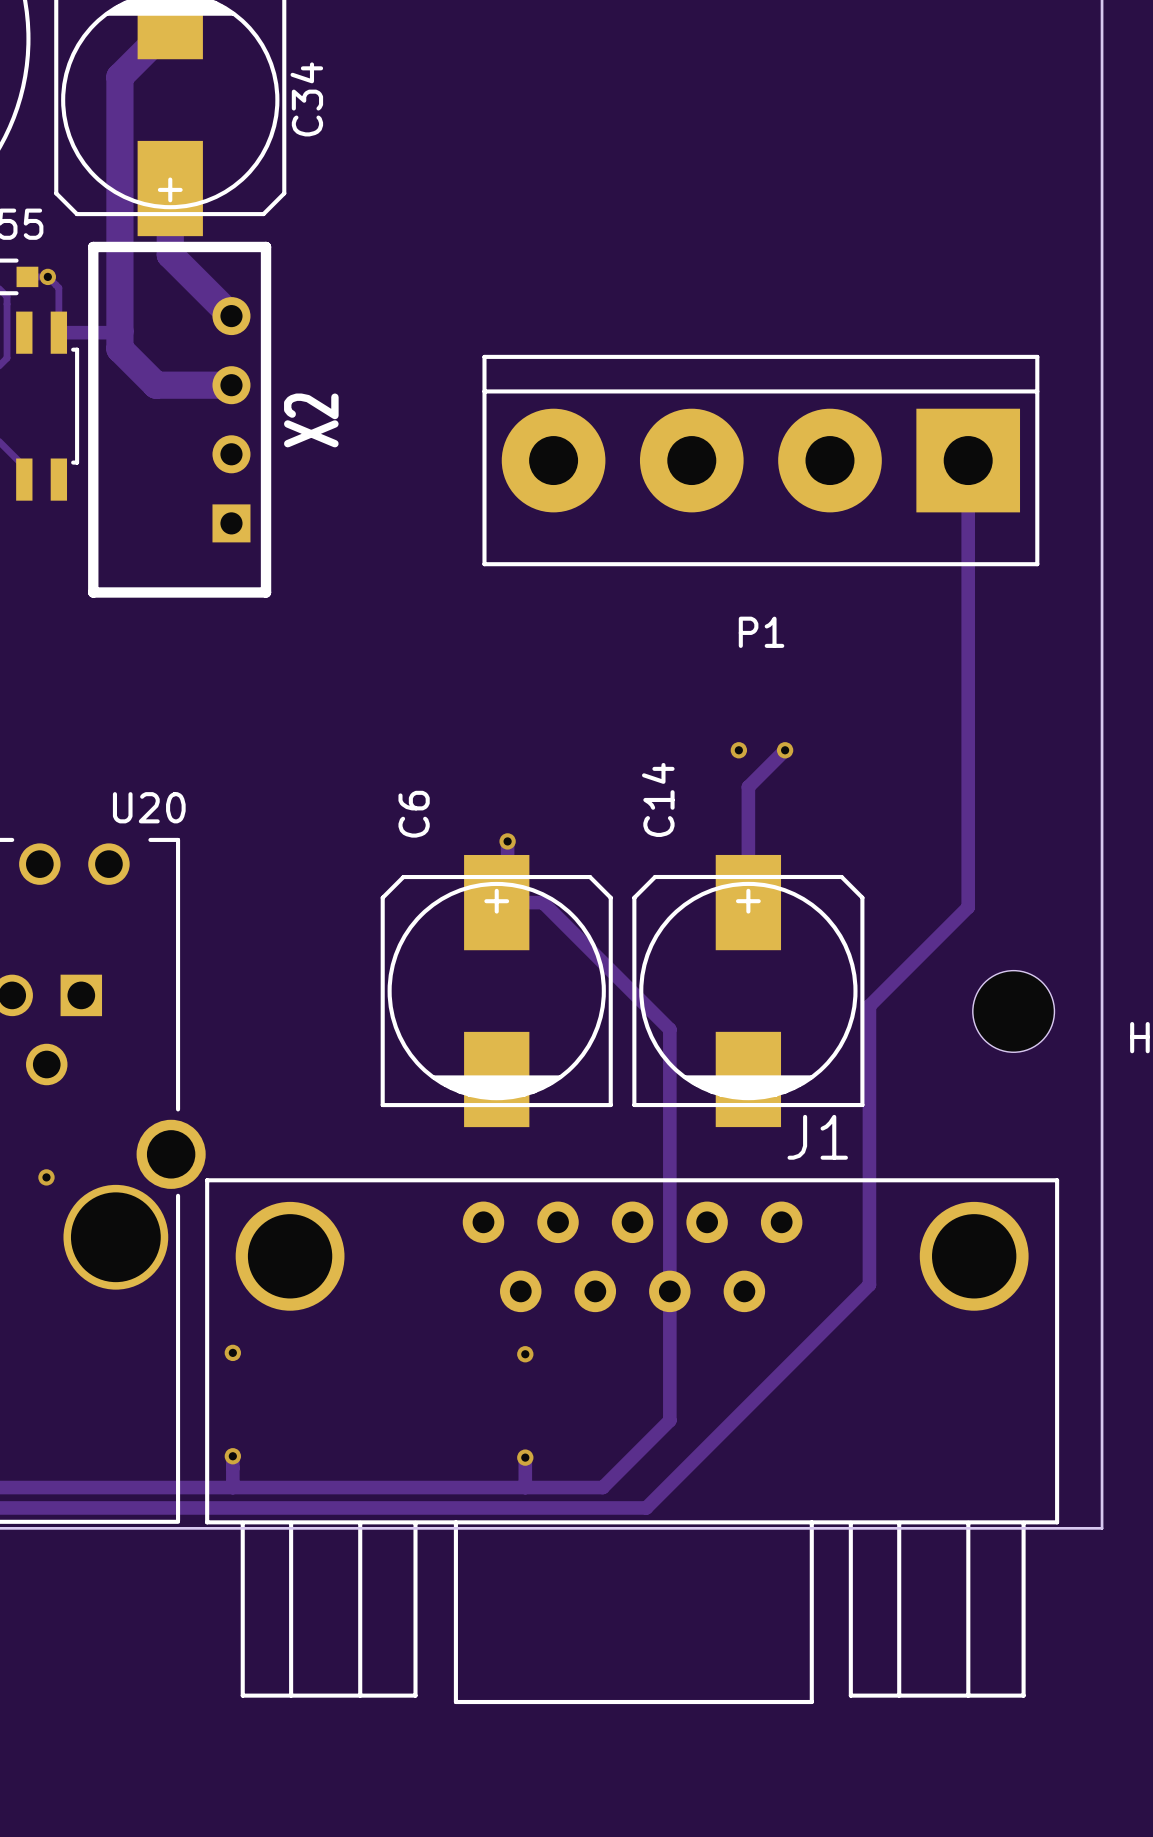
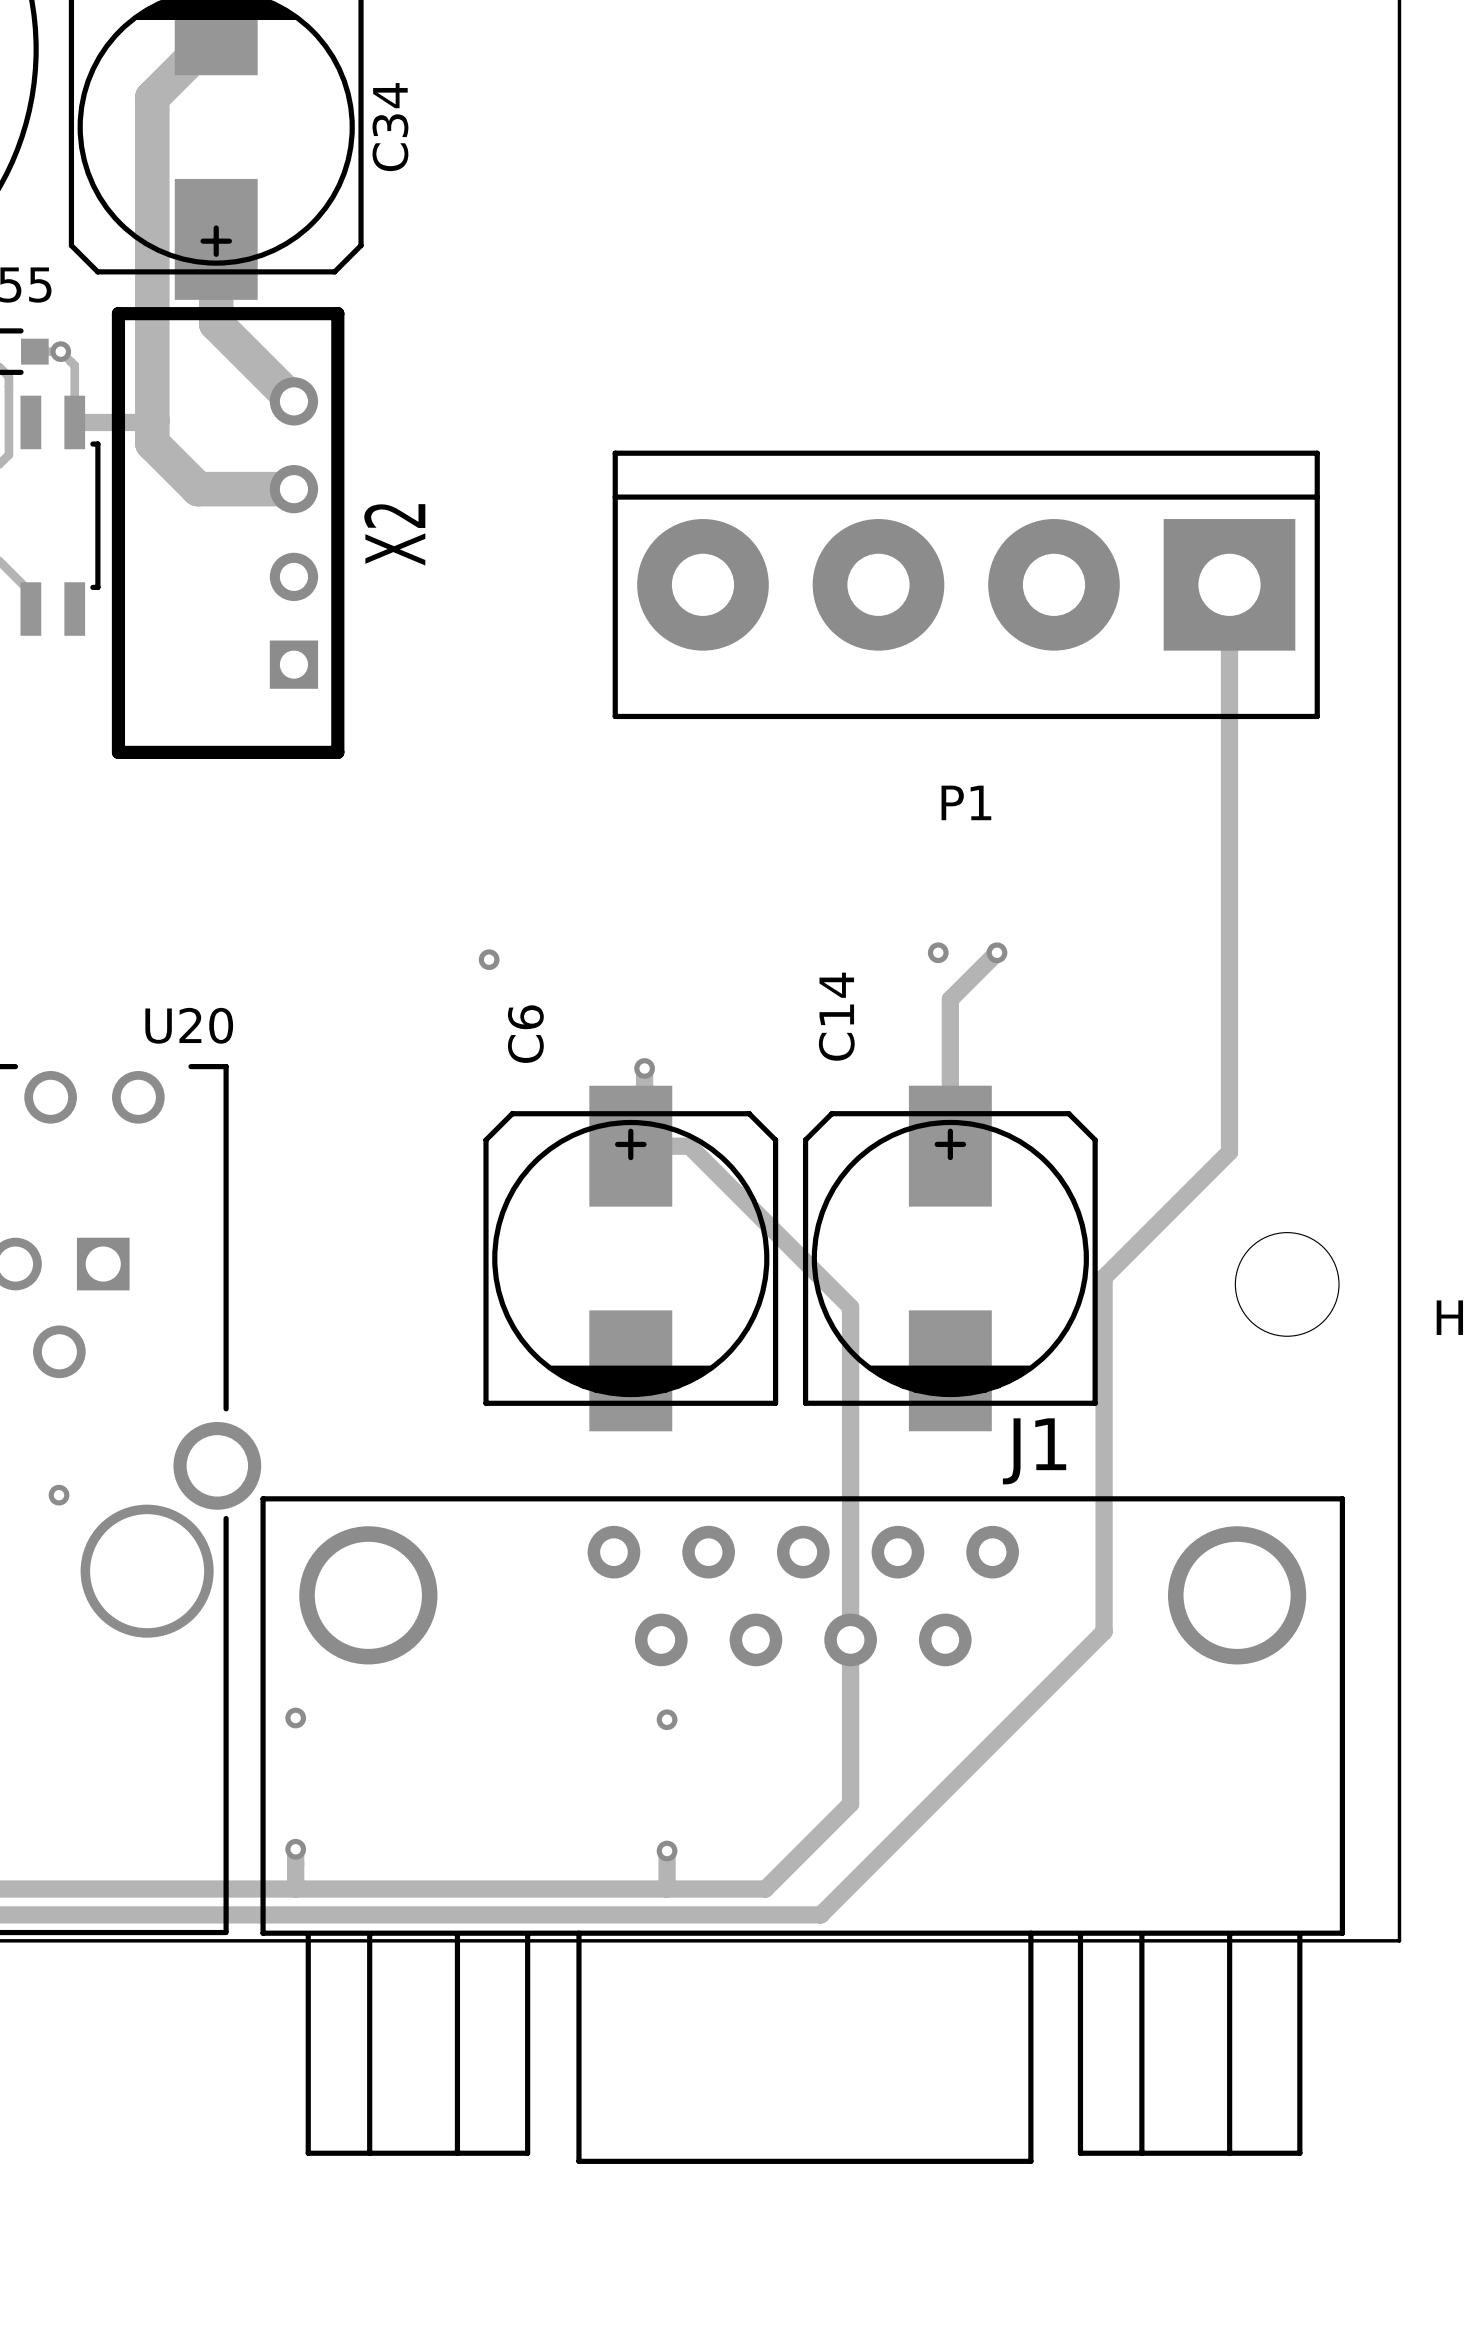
via: none -> (489, 959)

